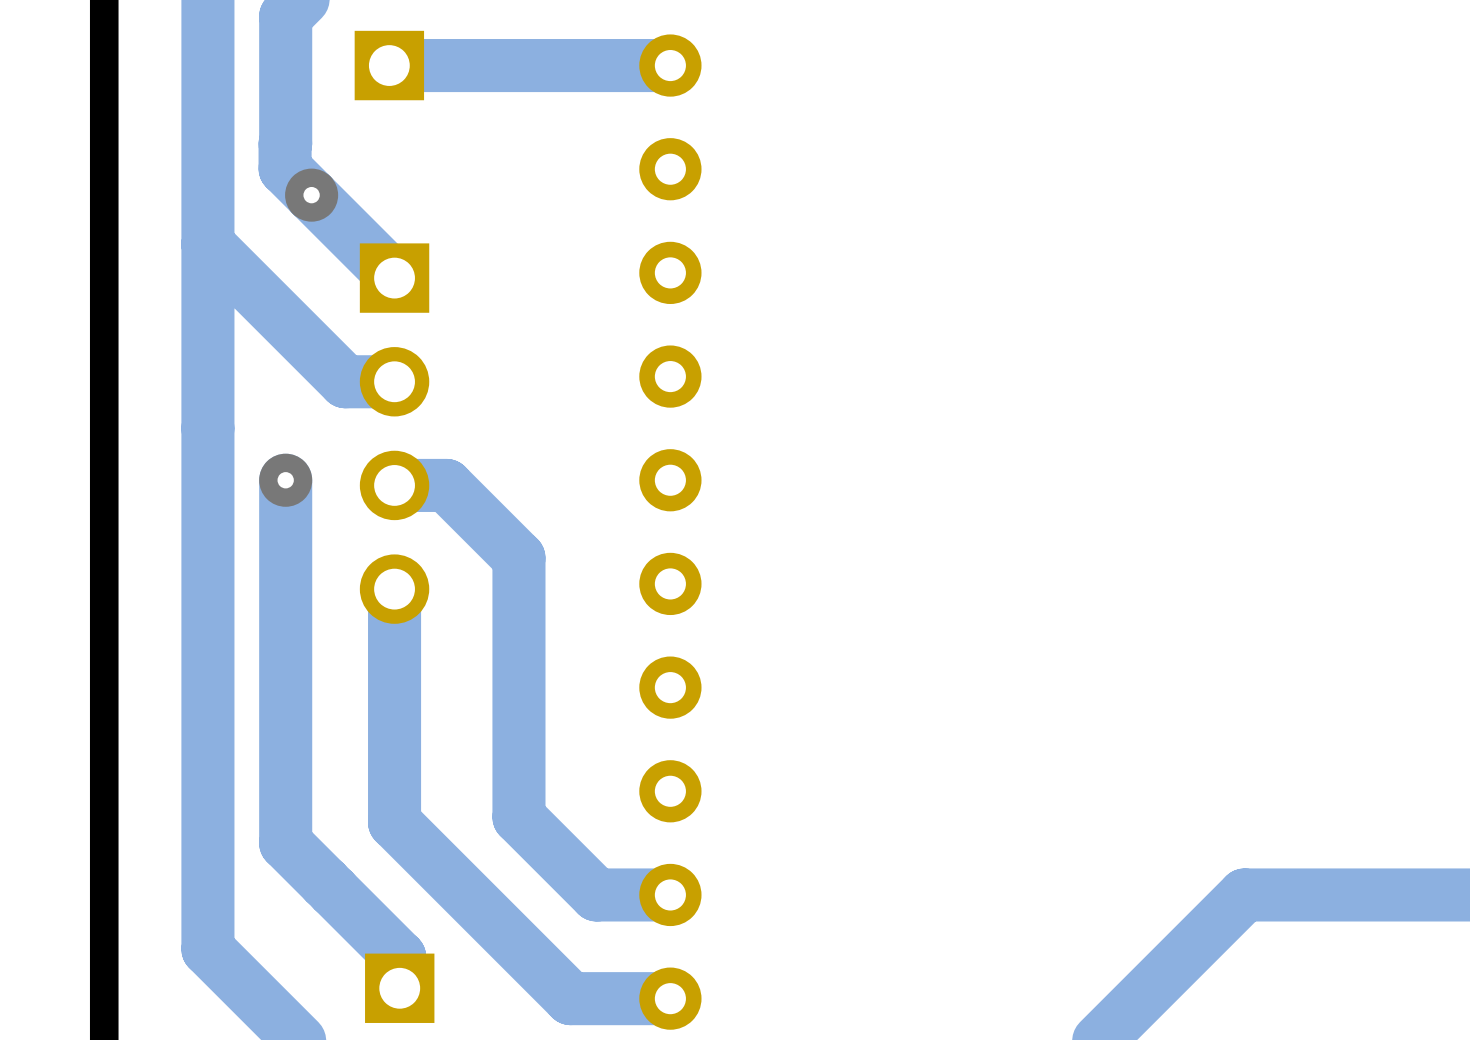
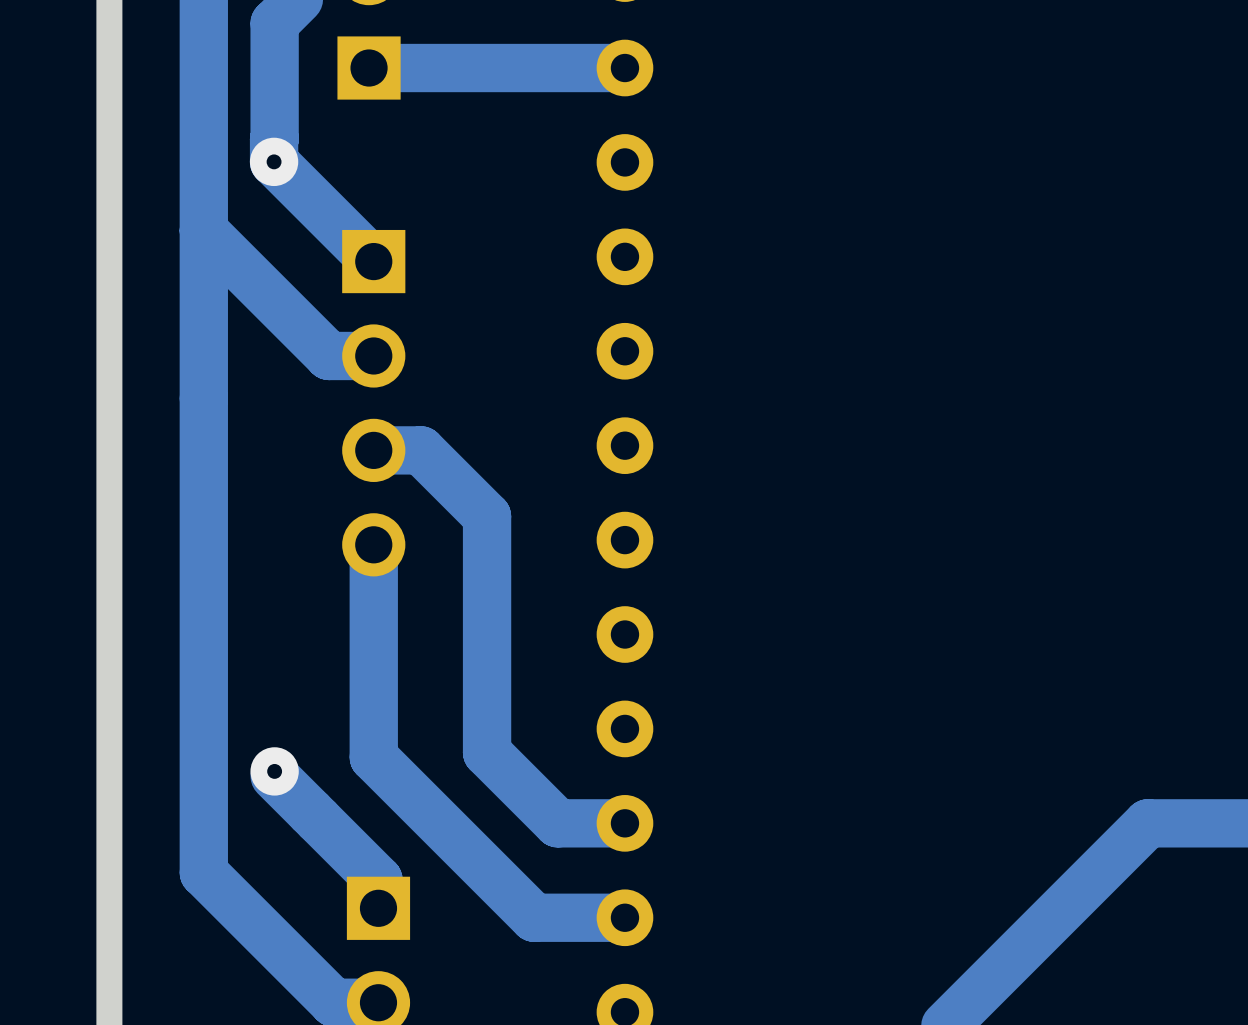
via position: (311, 195) -> (274, 161)
track: (285, 480) (285, 843) -> none
via: (285, 480) -> none
via: none -> (274, 771)

